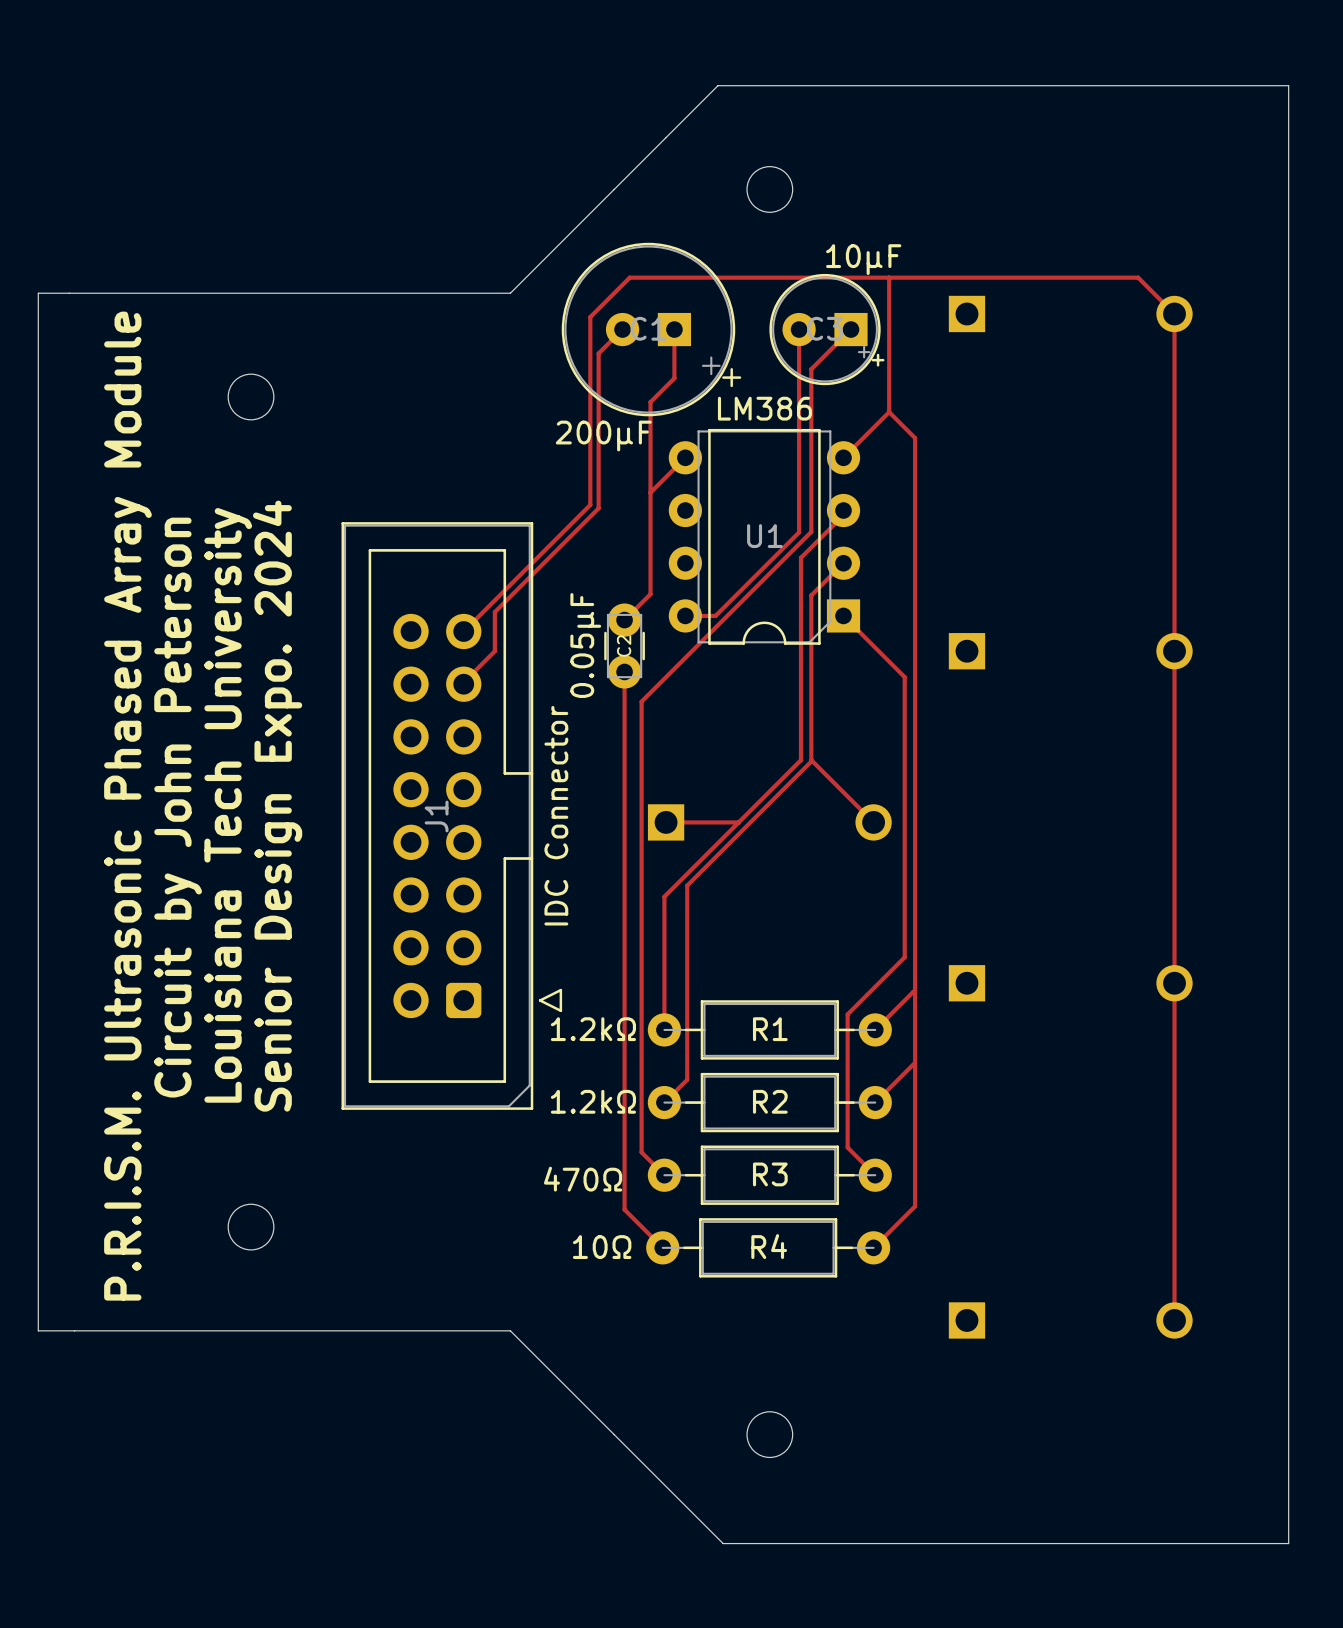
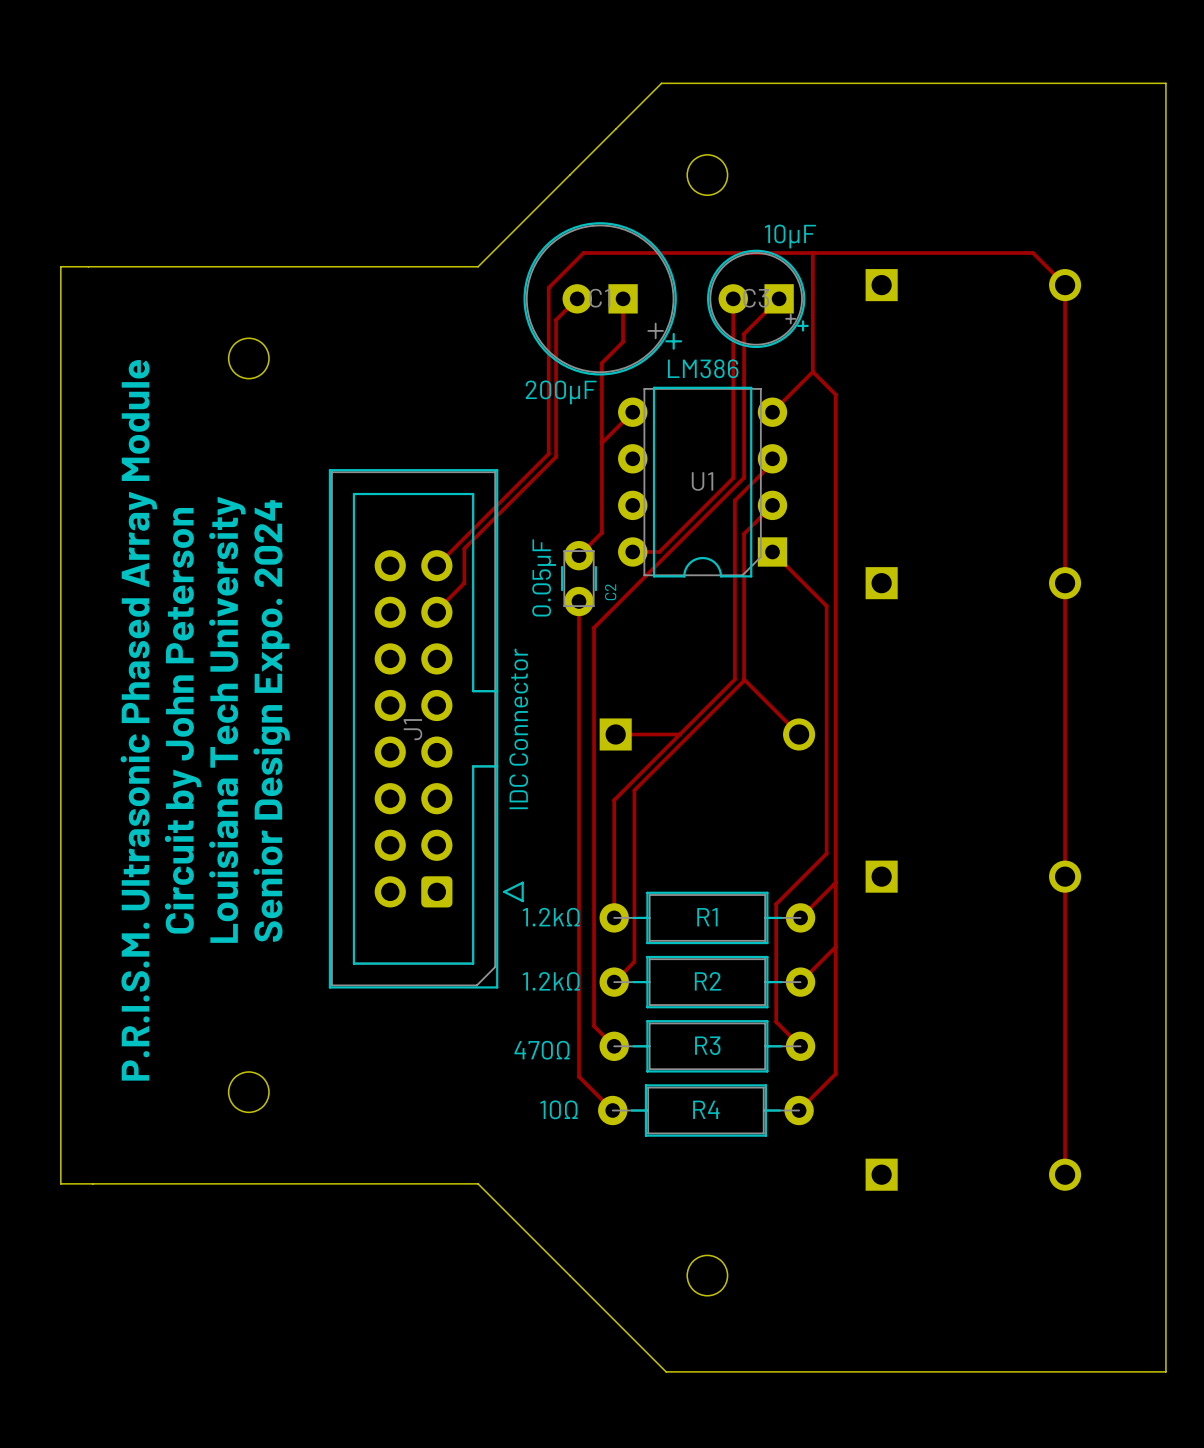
C2 name position: C2 (624, 646) -> C2 (610, 592)

